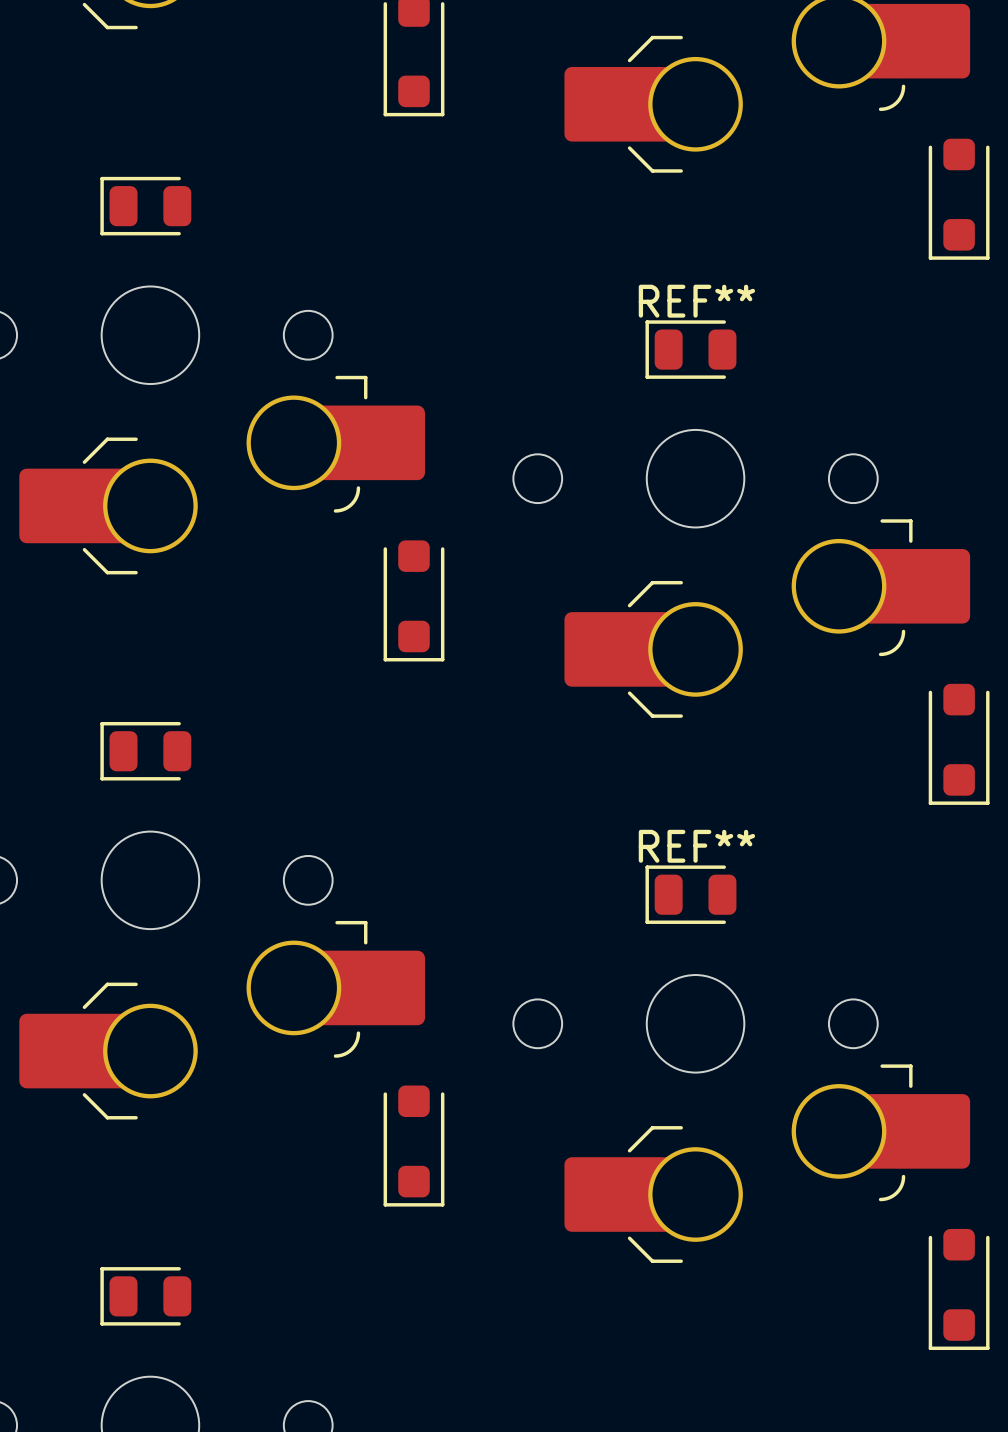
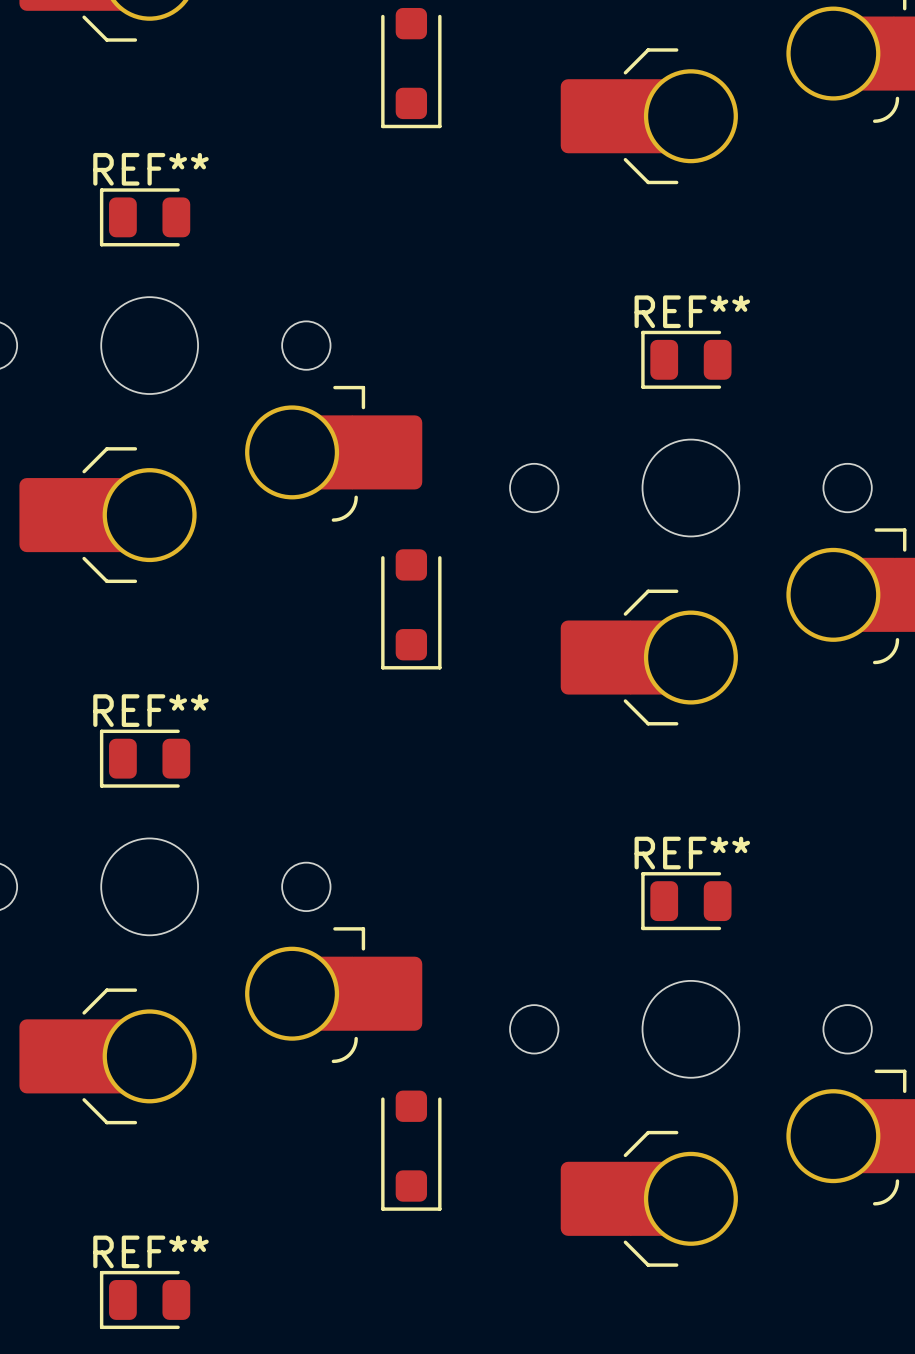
REF** name: none -> REF** (150, 169)
REF** name: none -> REF** (150, 710)
REF** name: none -> REF** (150, 1251)

